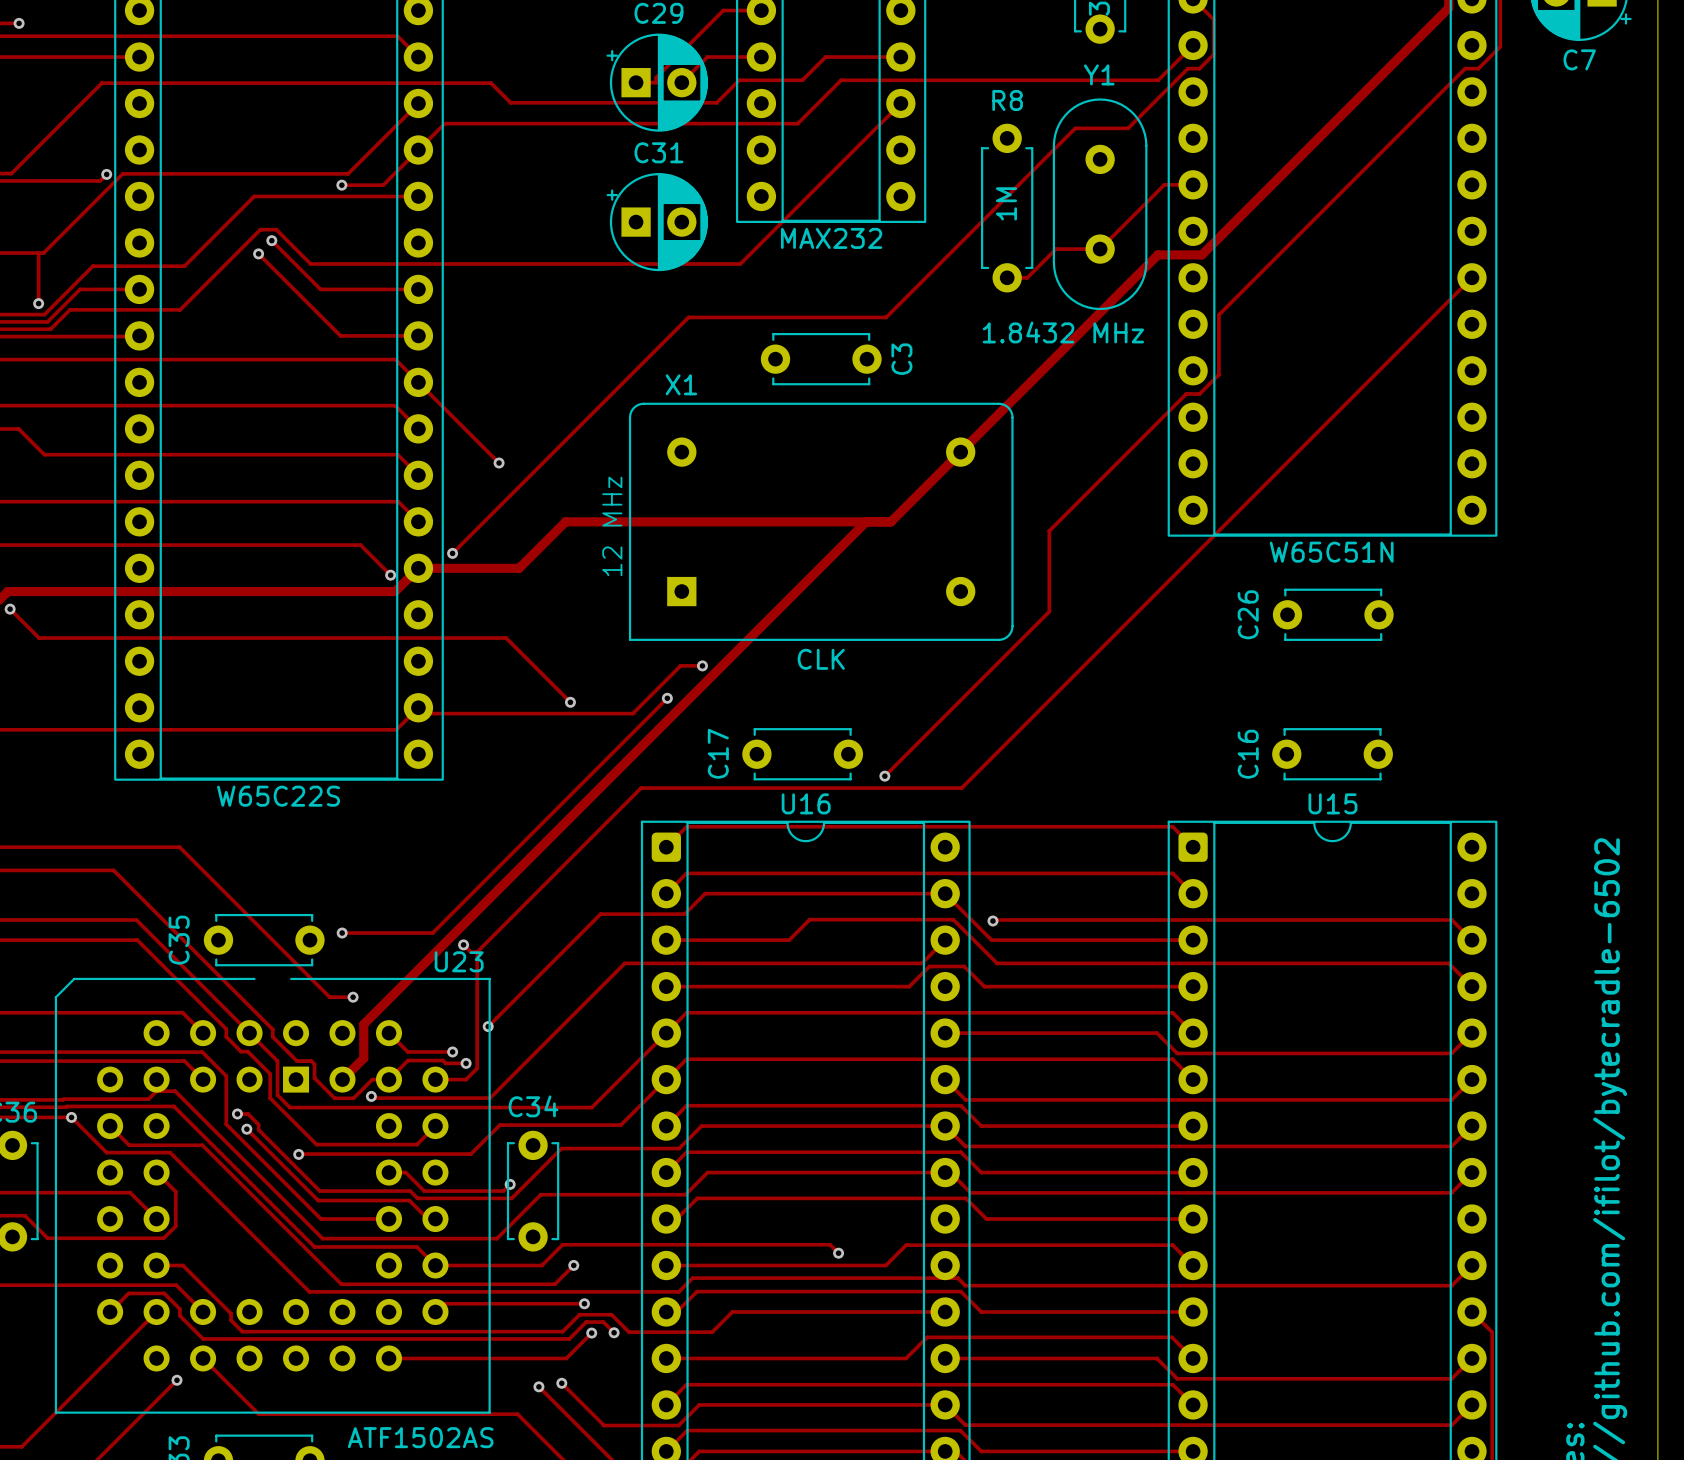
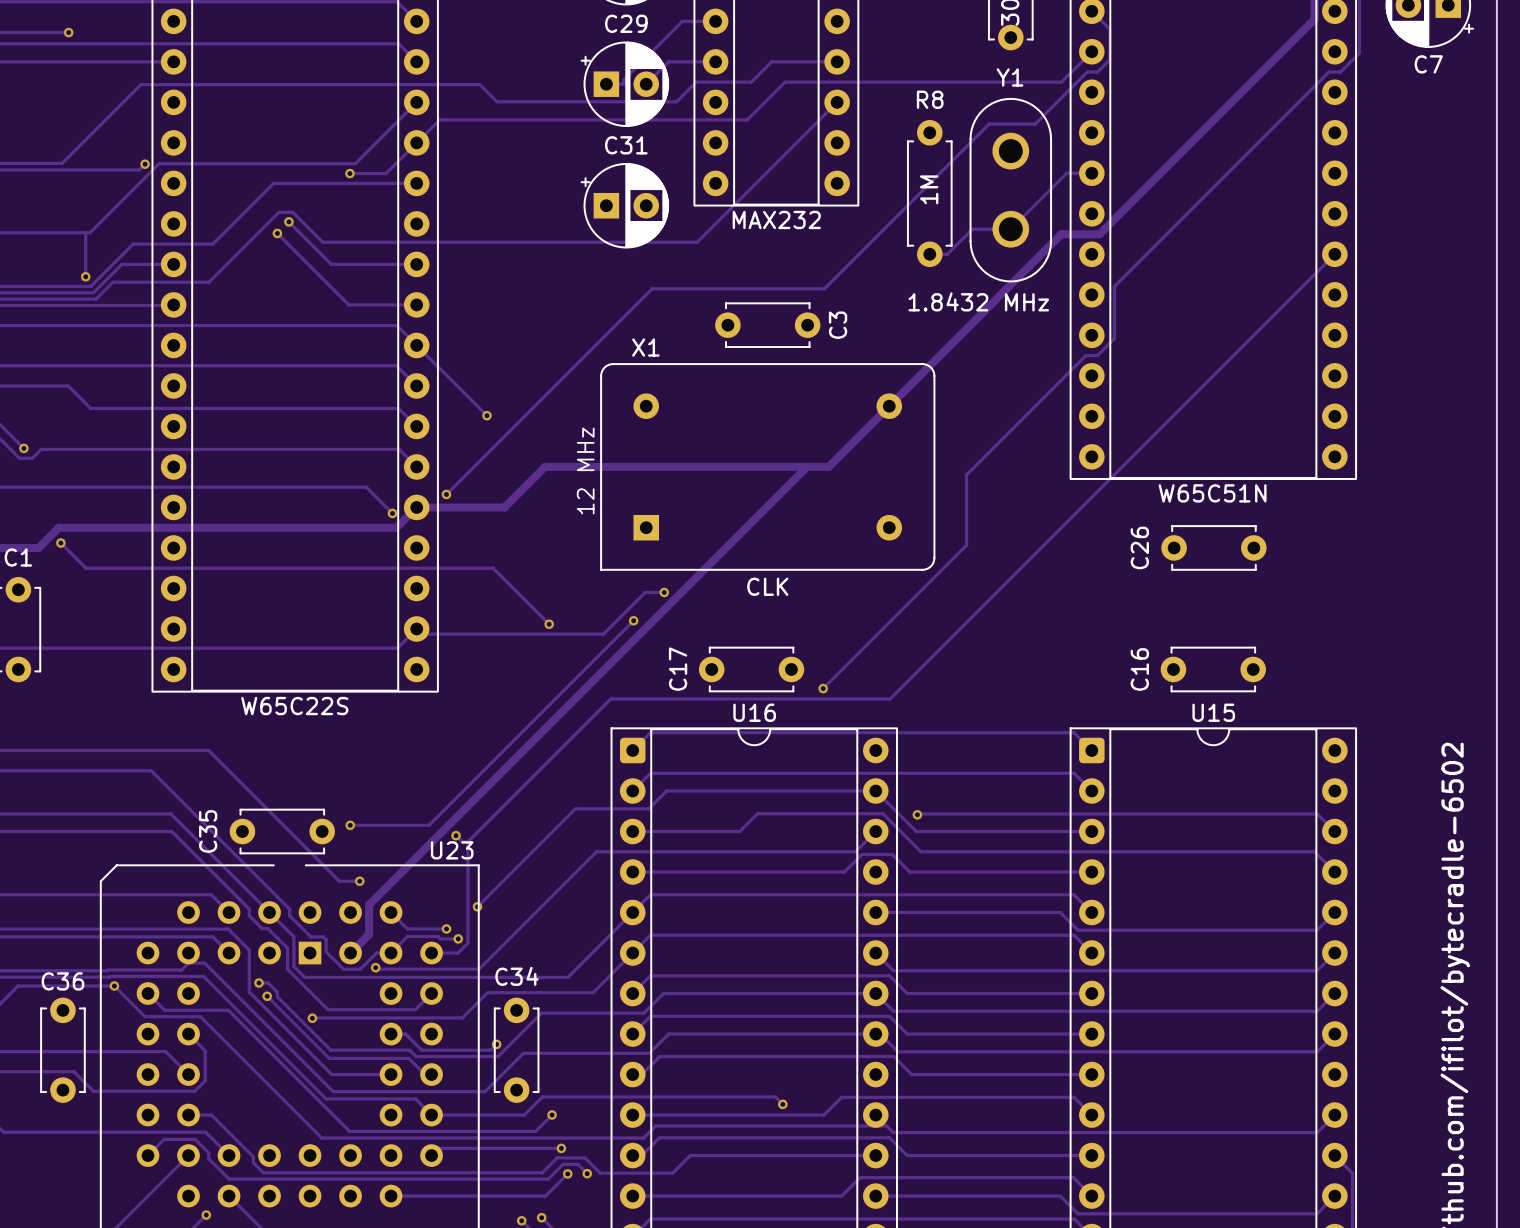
Y1 footprint: [1052, 98, 1148, 311] -> [969, 97, 1053, 283]

